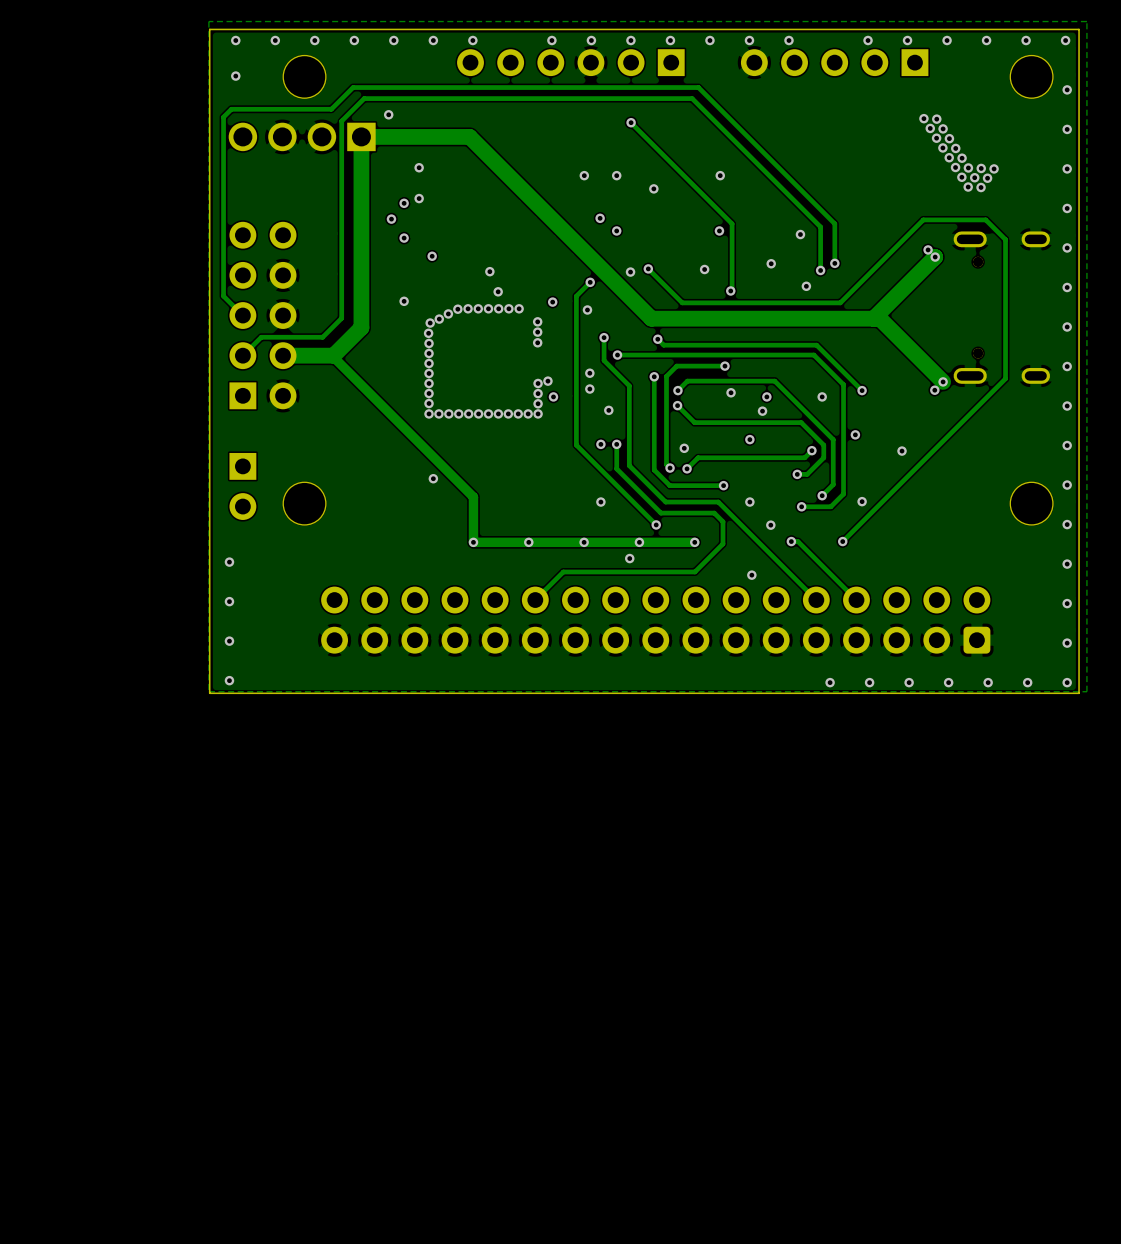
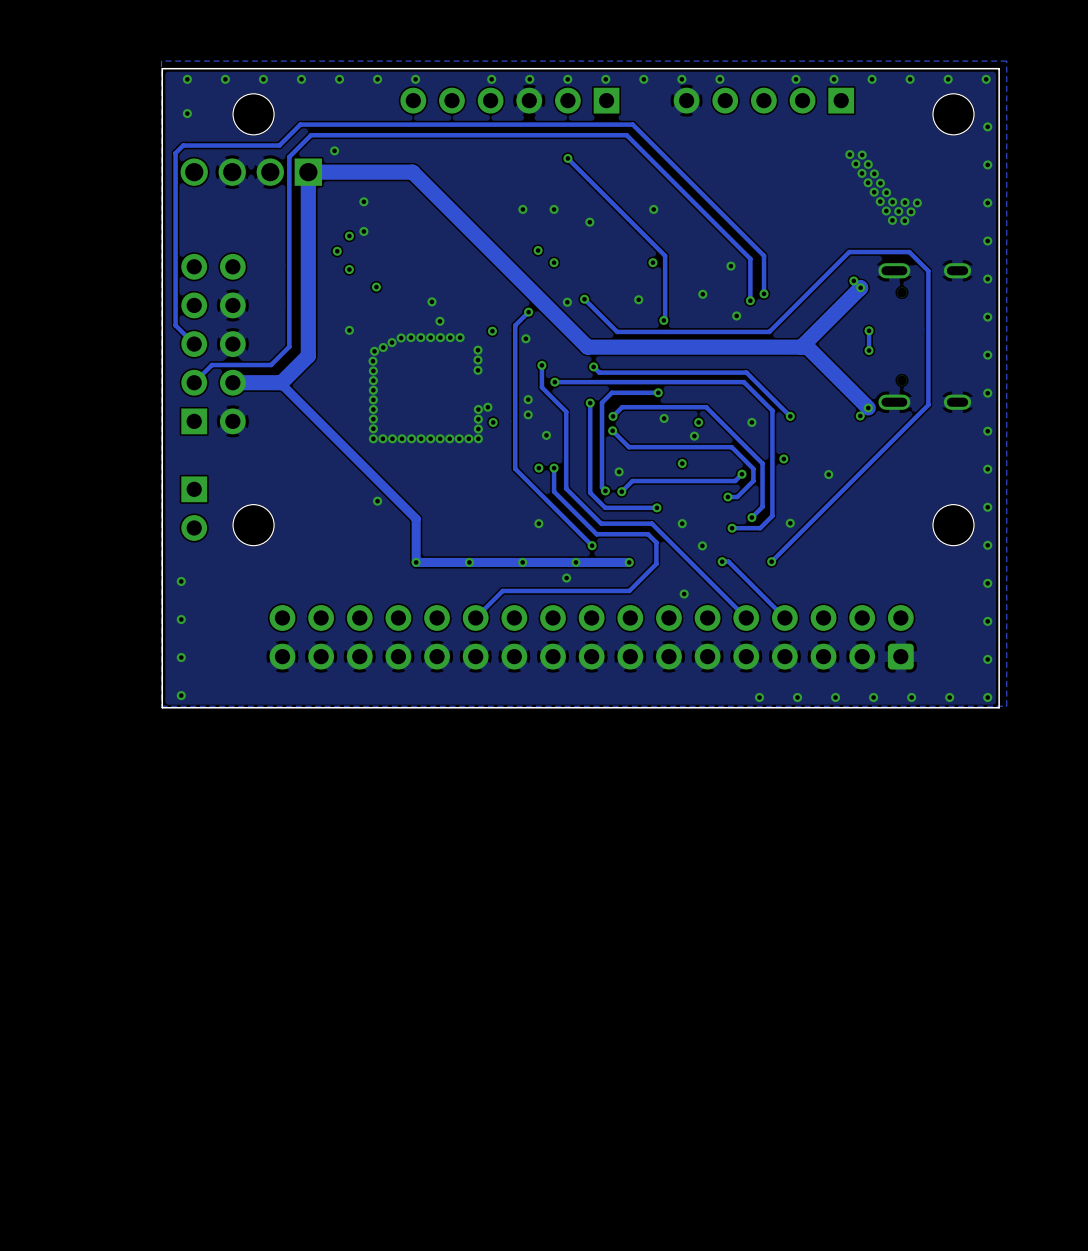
track: none -> (869, 330) (869, 350)
via: none -> (869, 330)
via: none -> (869, 350)

